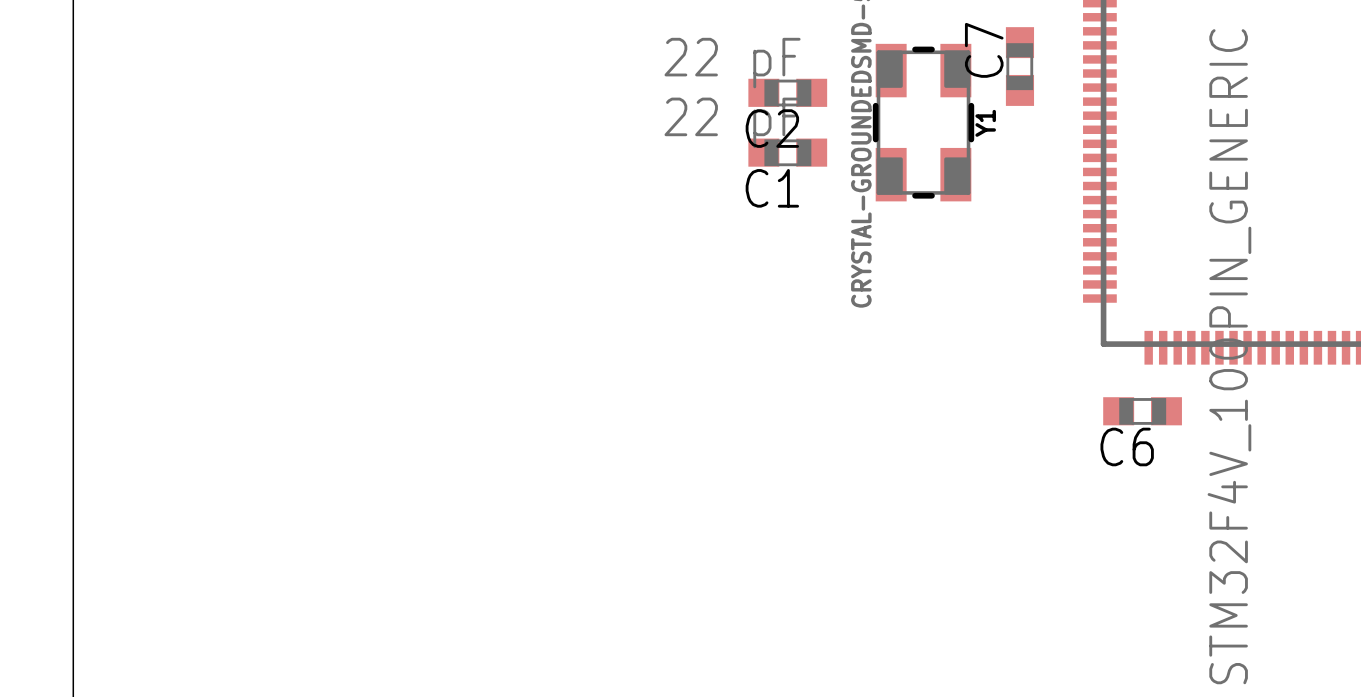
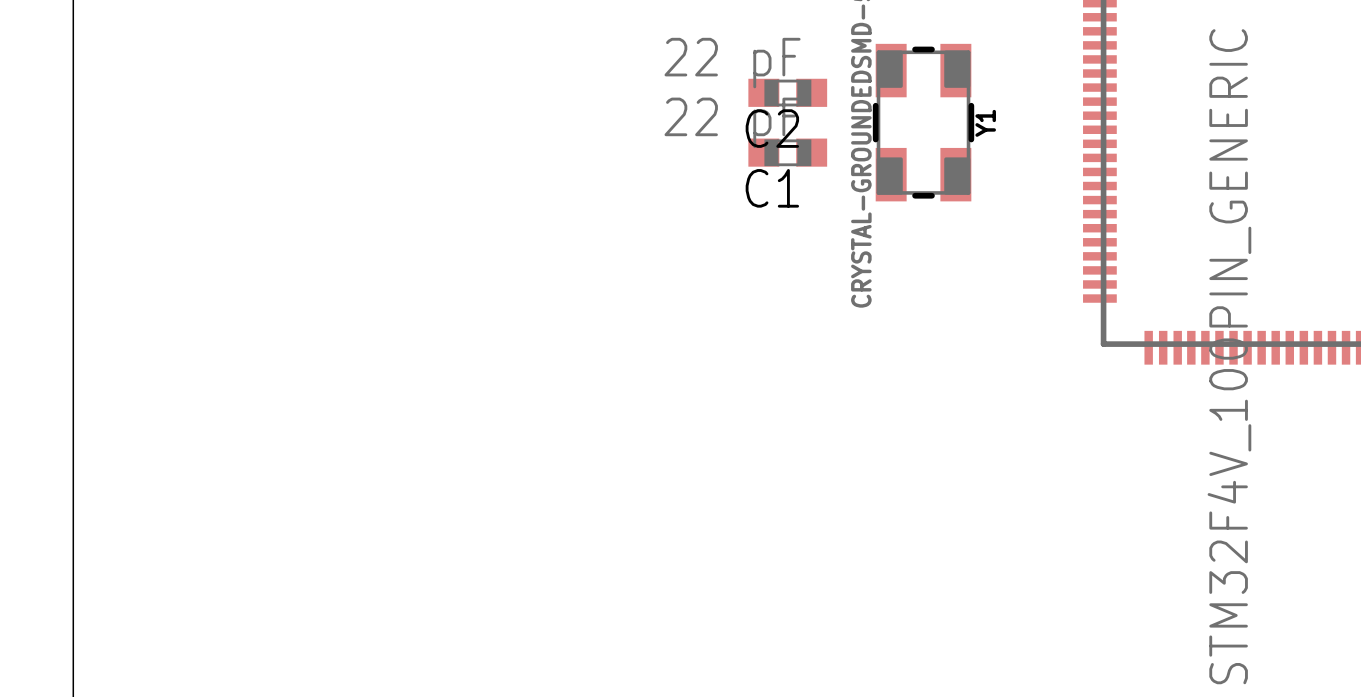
C7: (1019, 66) -> none
C6: (1142, 411) -> none

